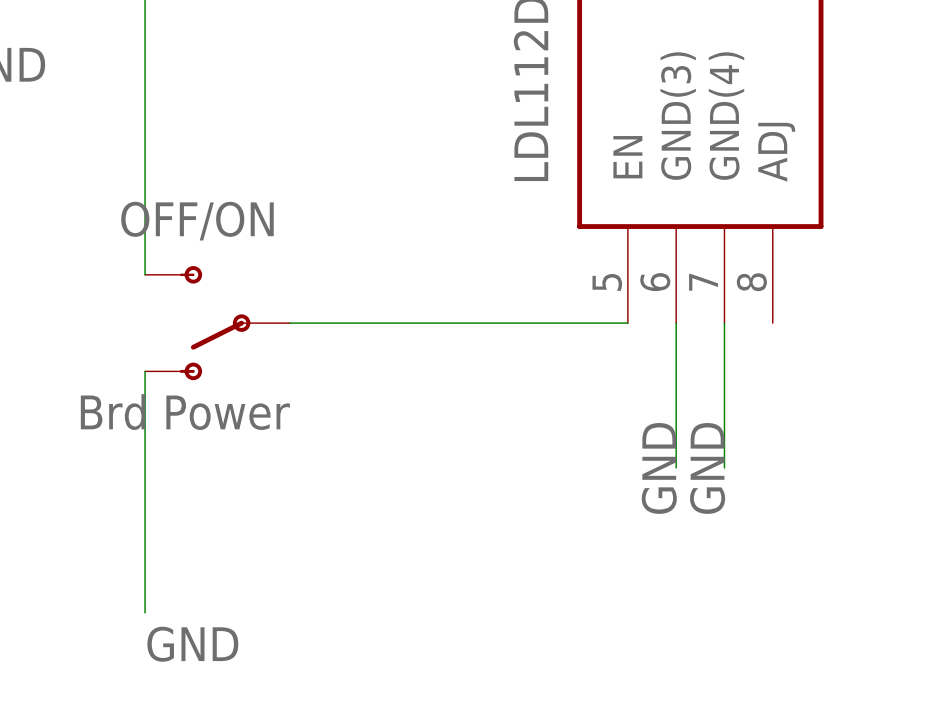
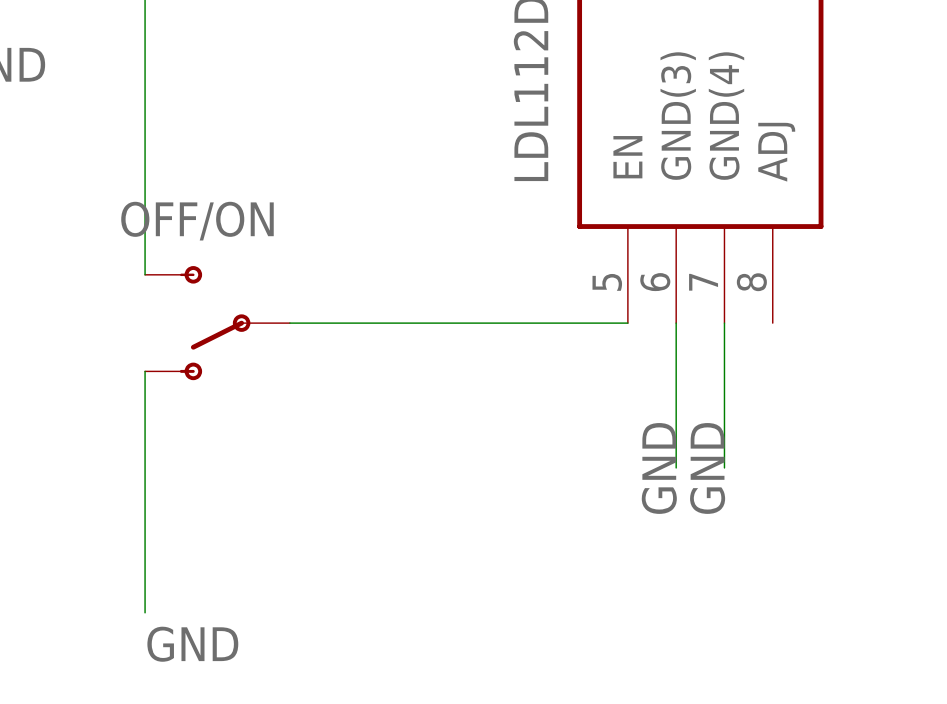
OFF/ON value: Brd Power (185, 412) -> none

